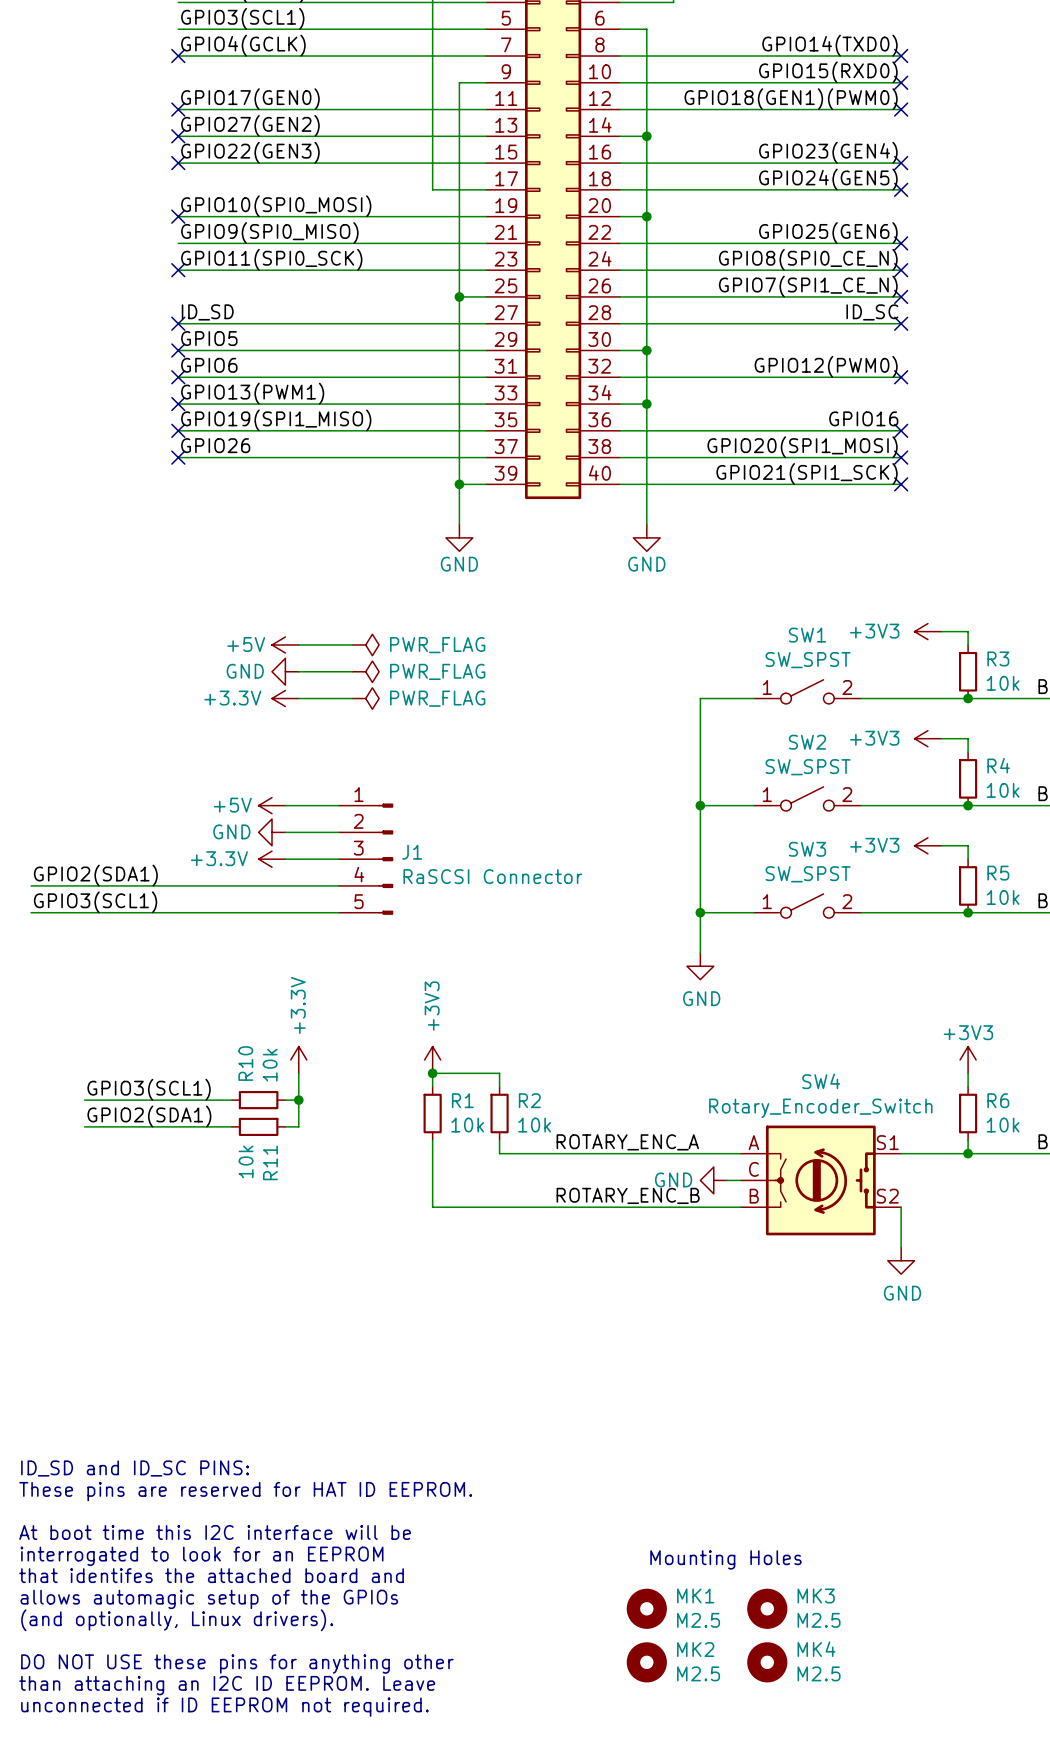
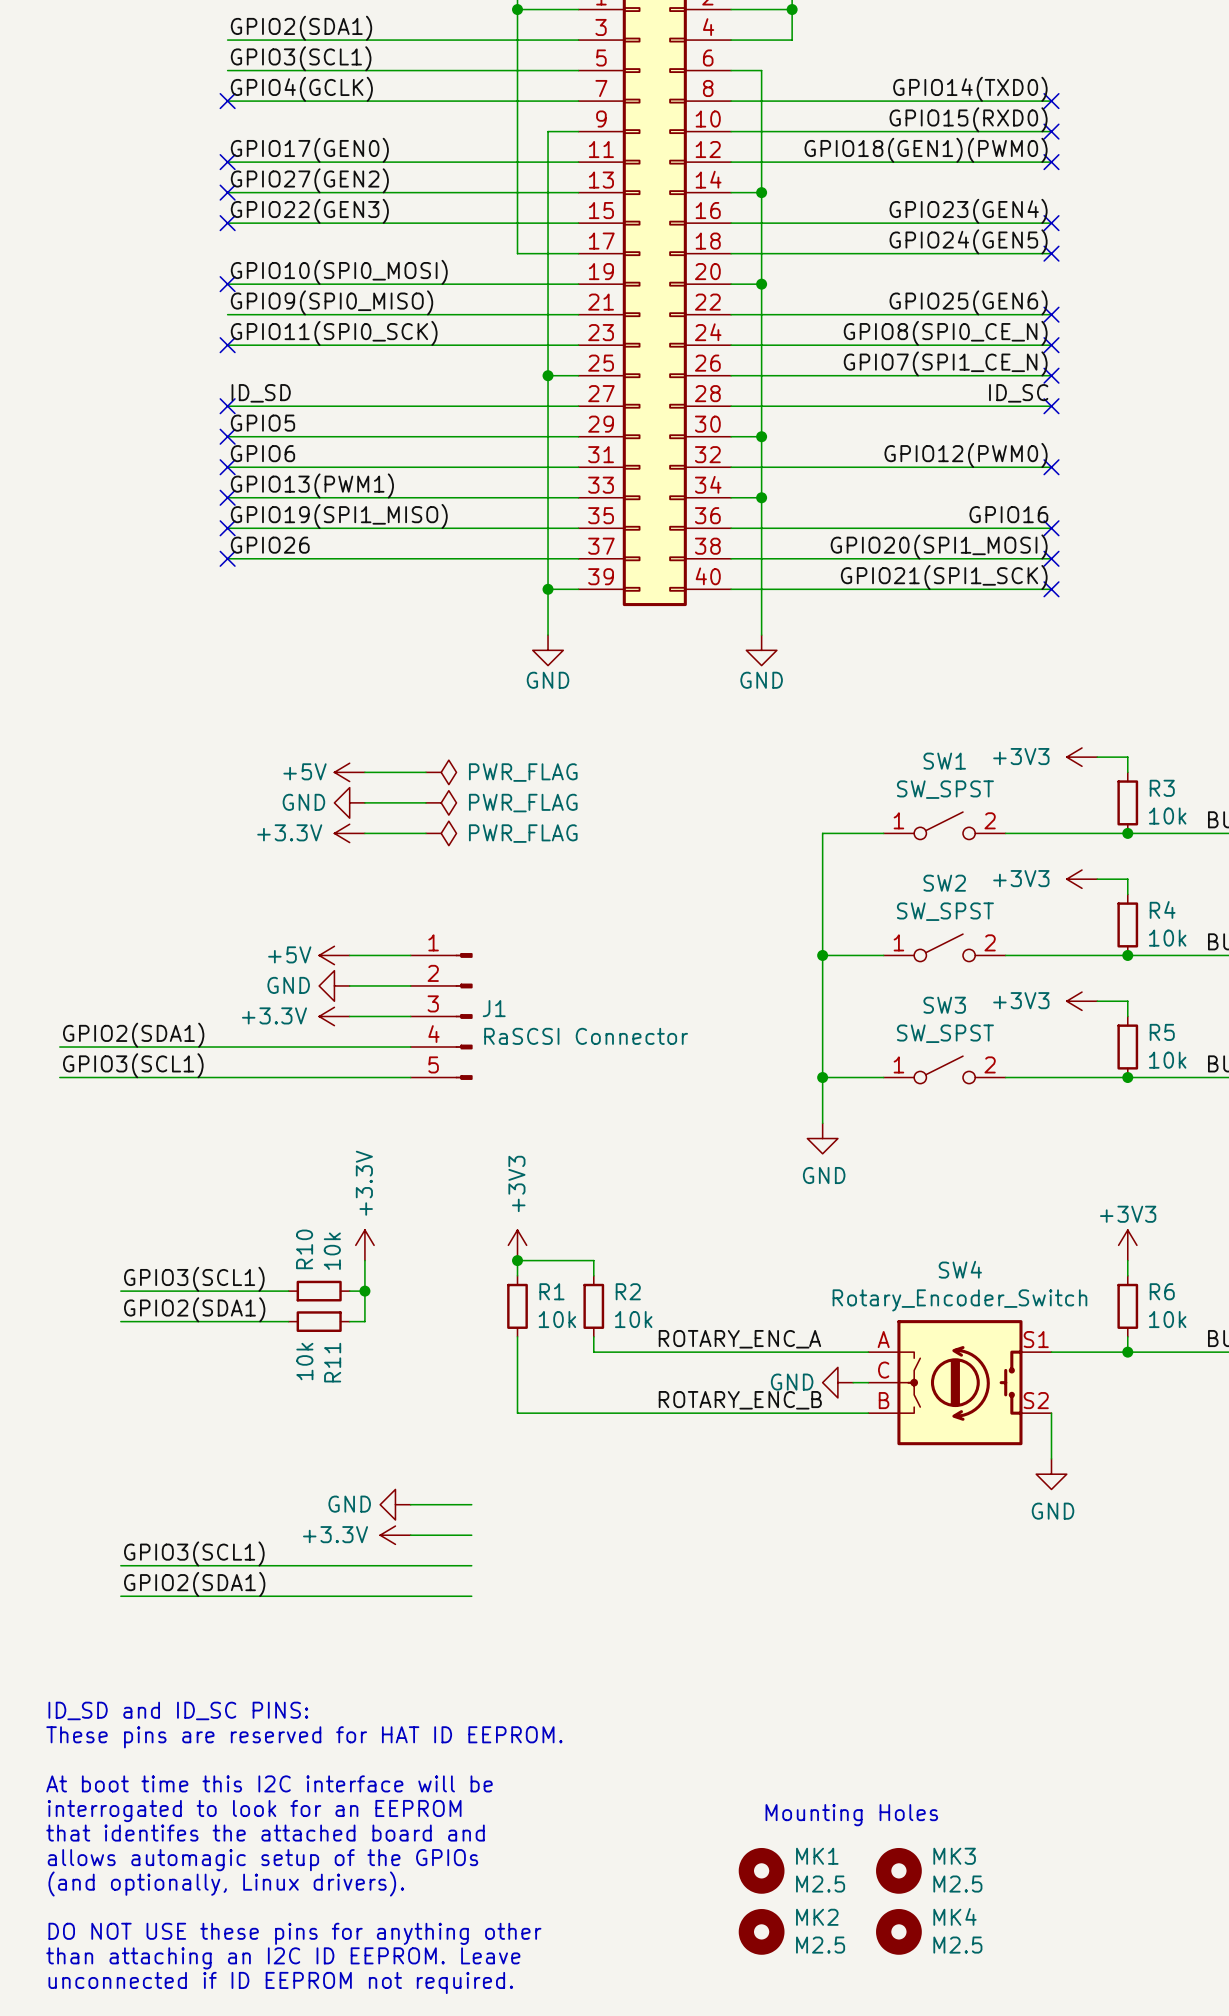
power symbol: none -> GND (395, 1504)
wire: none -> (410, 1504) (471, 1504)
power symbol: none -> +3.3V (395, 1535)
wire: none -> (410, 1535) (471, 1535)
label: none -> GPIO3(SCL1) (194, 1553)
wire: none -> (120, 1565) (471, 1565)
label: none -> GPIO2(SDA1) (194, 1584)
wire: none -> (120, 1596) (471, 1596)

